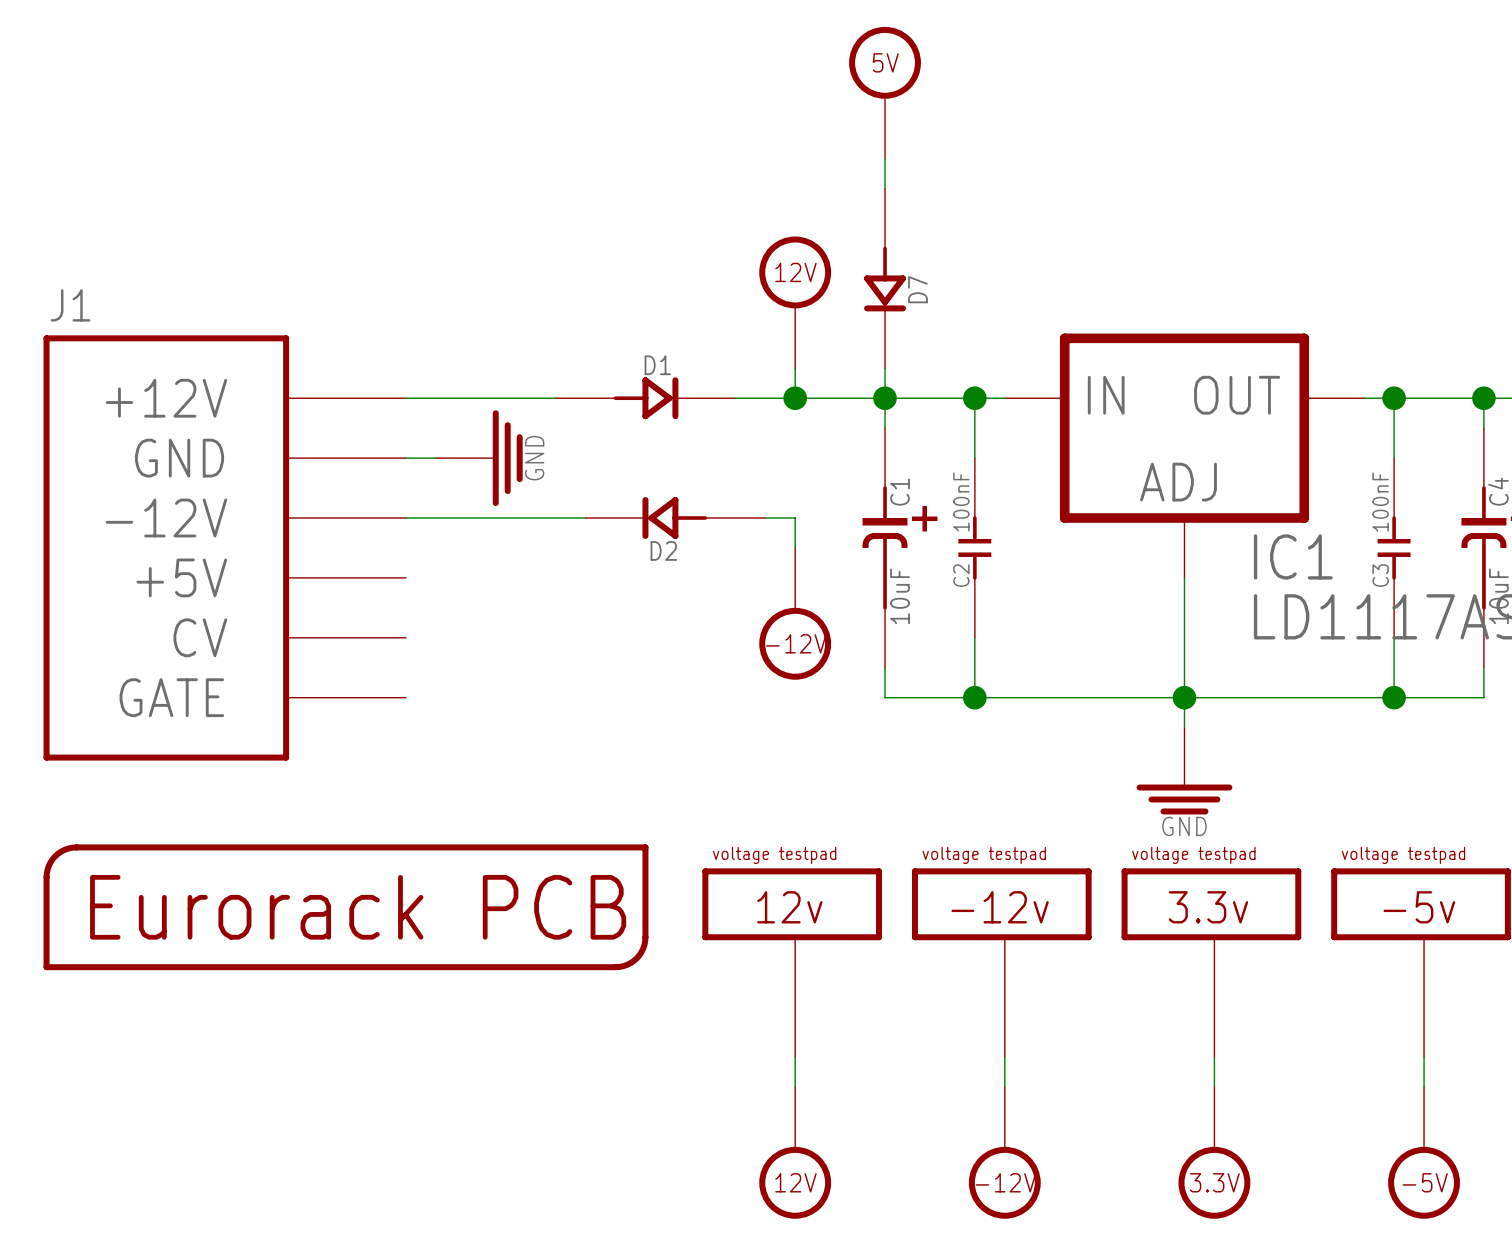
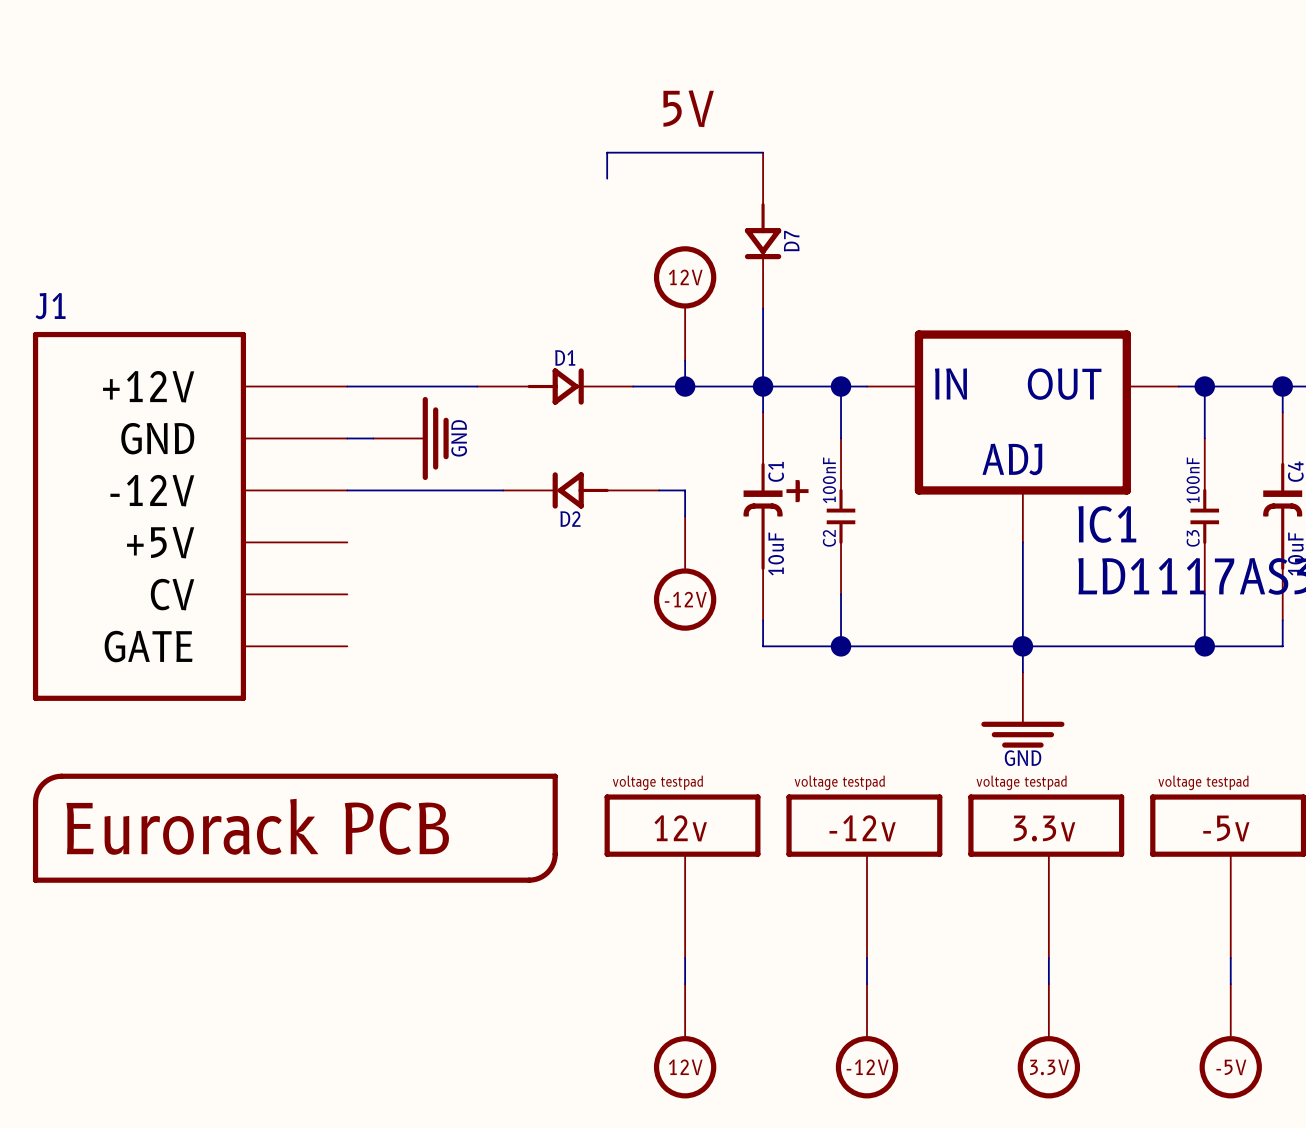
label: none -> 5V (688, 108)
power symbol: (885, 92) -> none
wire: none -> (763, 152) (607, 152) (607, 178)
D7 position: (885, 278) -> (763, 230)

